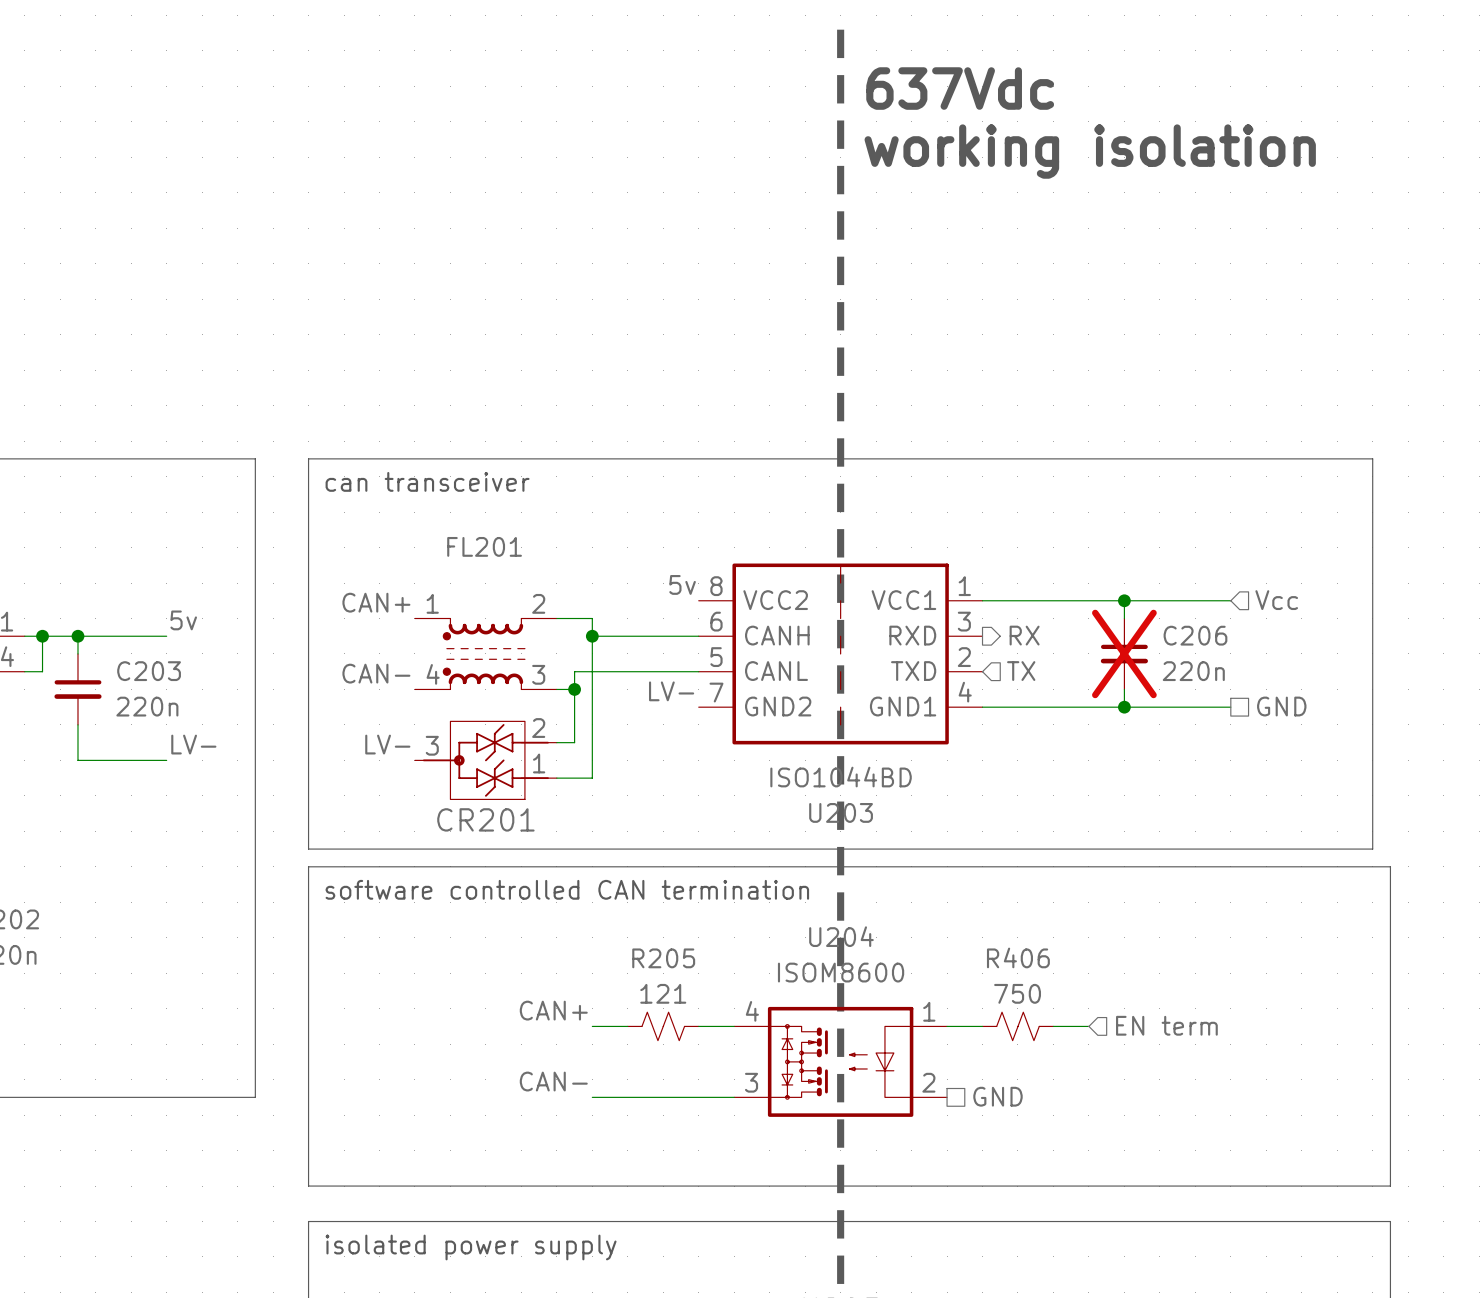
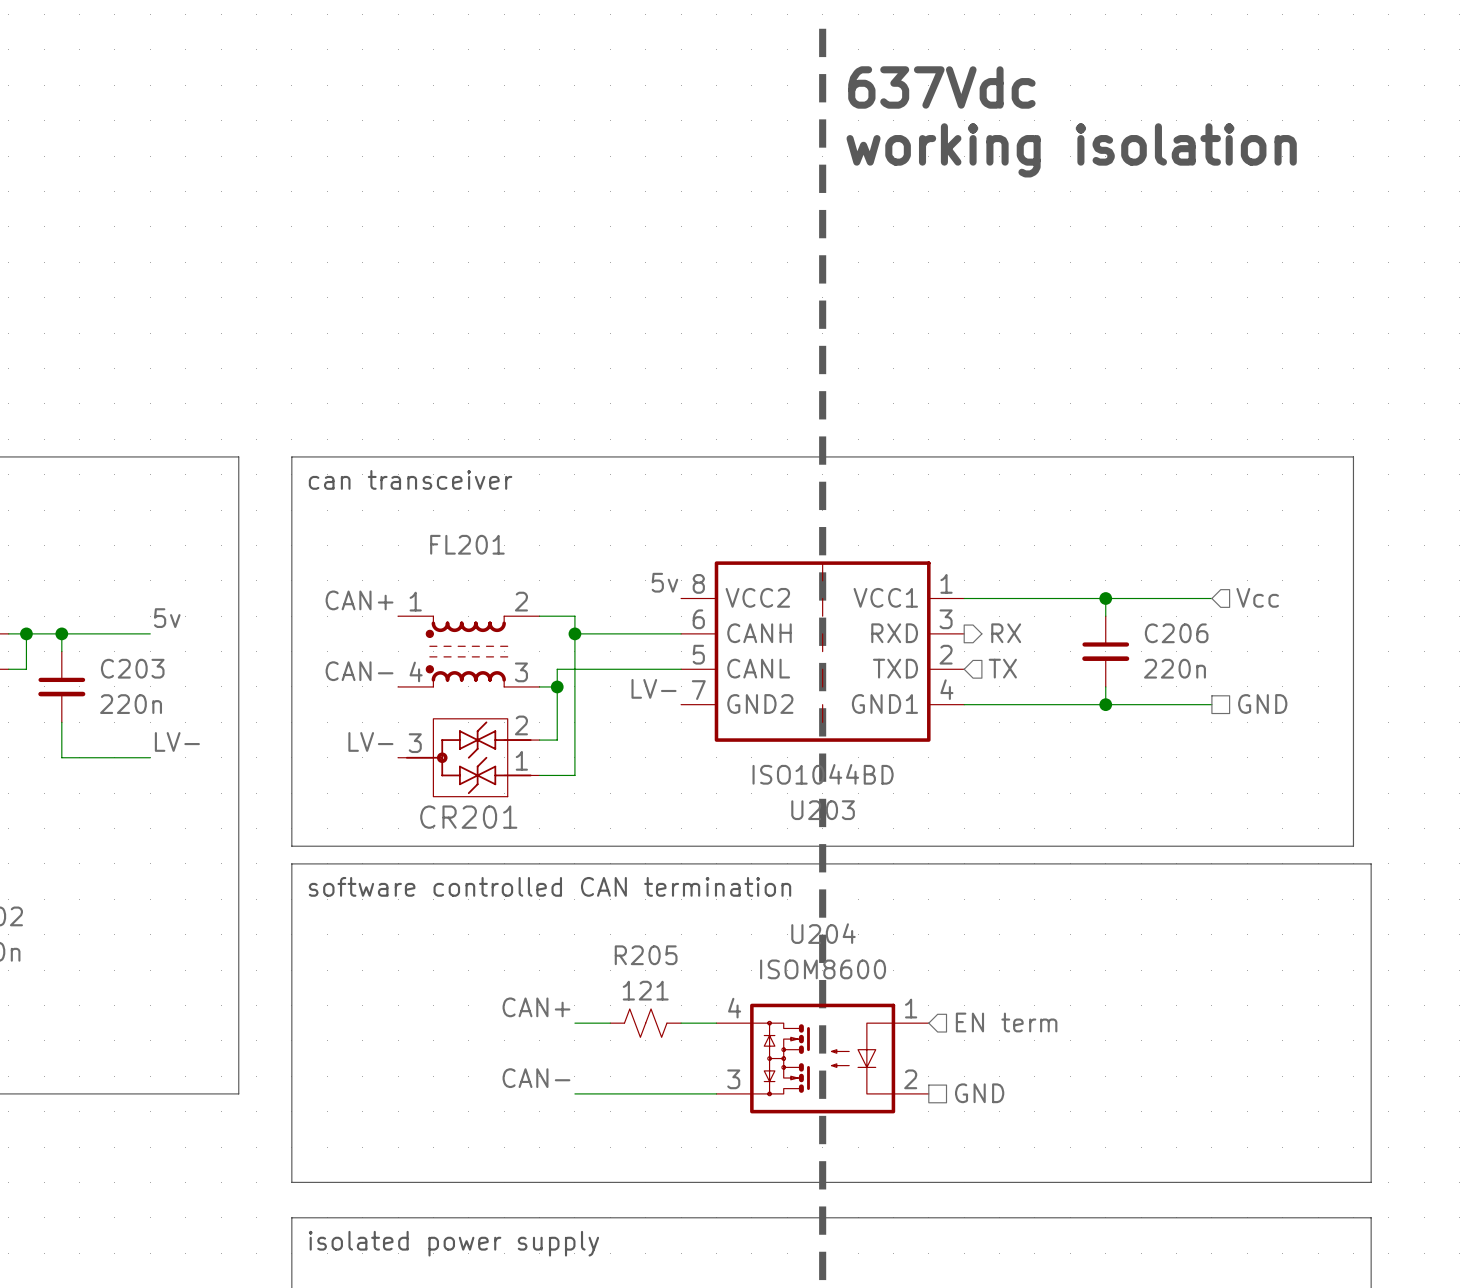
C206 do-not-place cross: (1124, 653) -> none
hierarchical label position: EN term (1166, 1025) -> EN term (1006, 1022)
wire: (947, 1026) (982, 1026) -> none
R406: 750 (1017, 1026) -> none
wire: (1053, 1026) (1088, 1026) -> none

